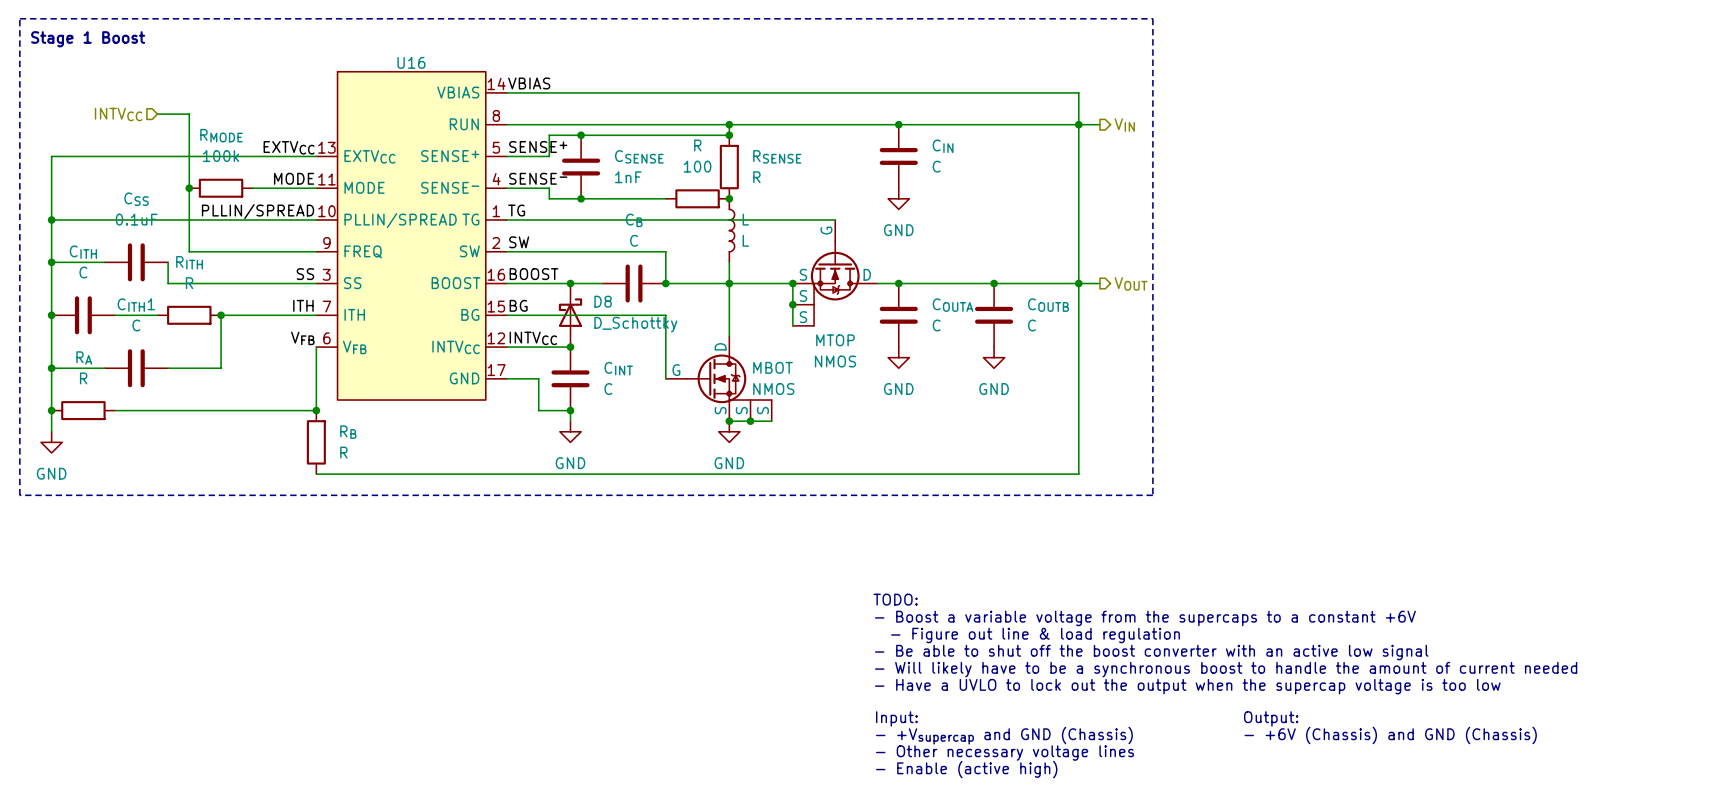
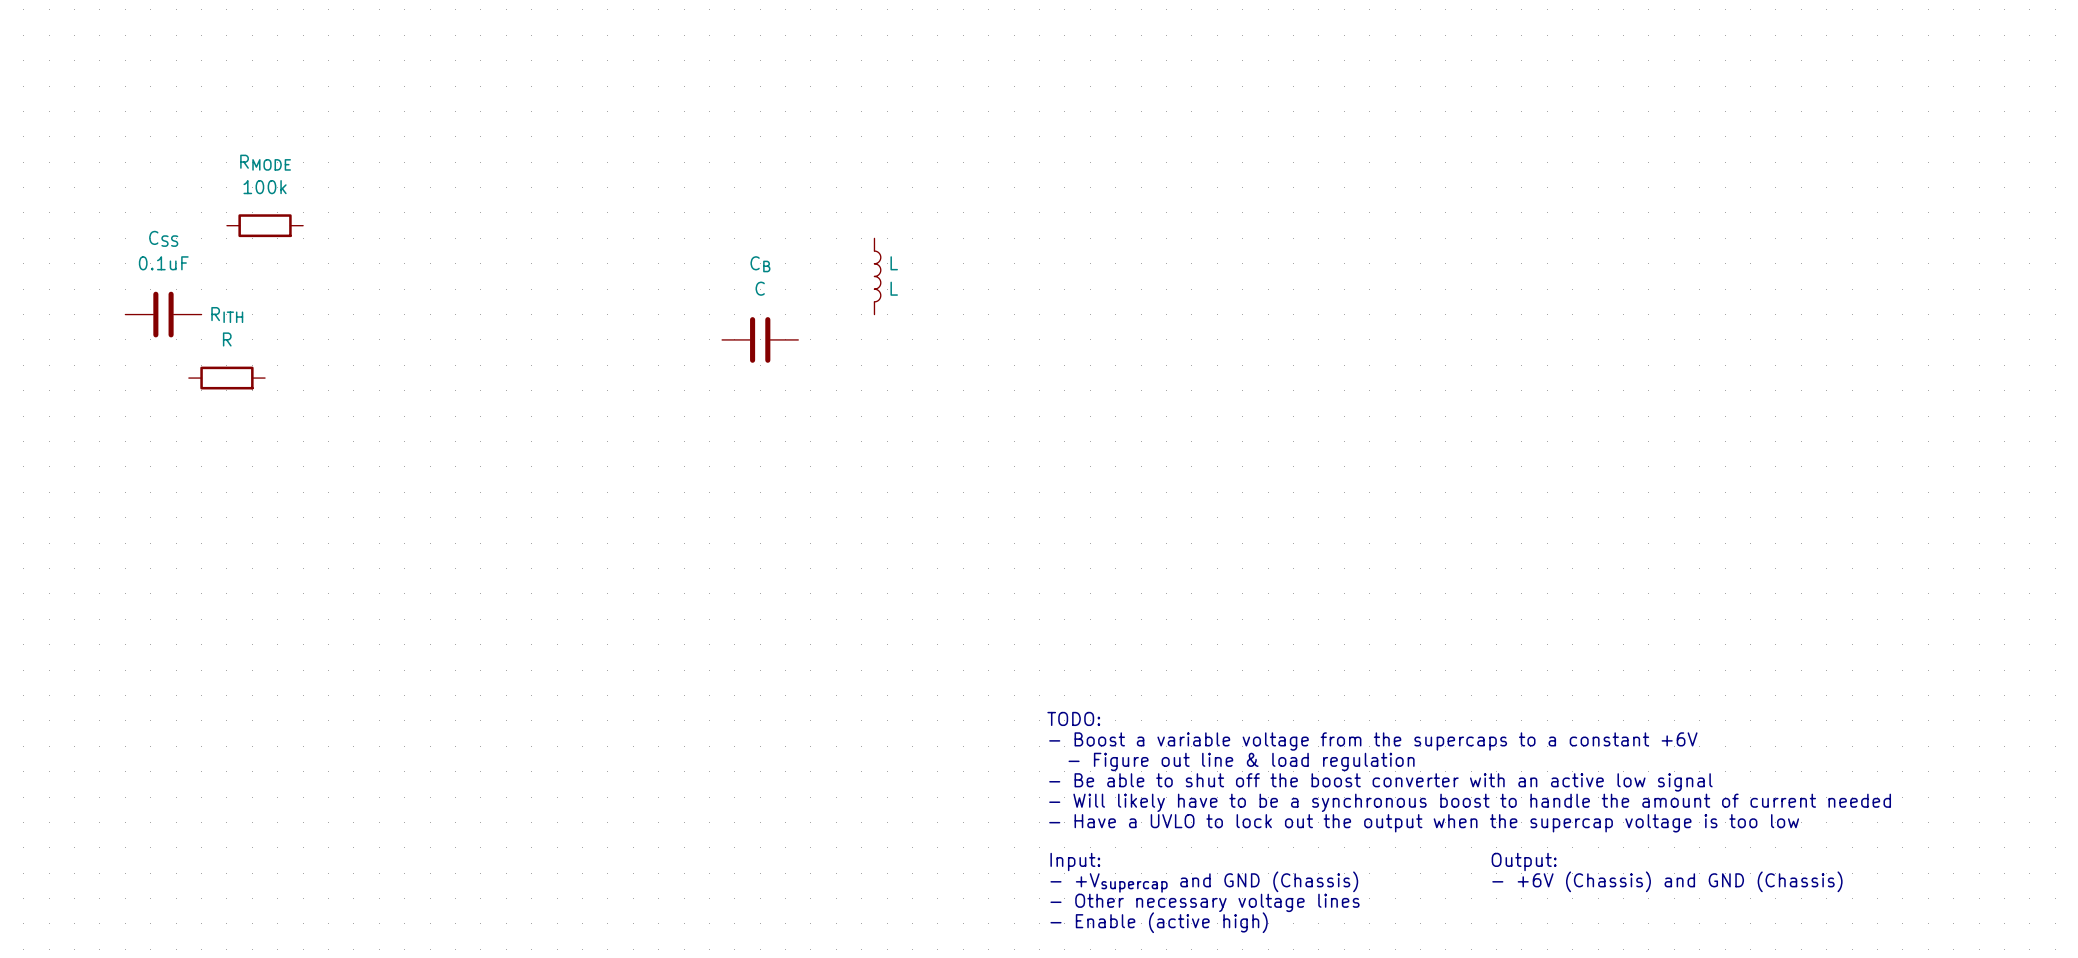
line: (19, 18) (1152, 18) (1152, 495) (19, 495) (19, 18) -> none
text: Stage 1 Boost (88, 39) -> none
label: VBIAS (529, 83) -> none
wire: (506, 92) (1078, 92) (1078, 474) (316, 474) -> none
hierarchical label: INTVCC (118, 114) -> none
wire: (157, 114) (189, 114) (189, 251) (316, 251) -> none
wire: (506, 124) (1099, 124) -> none
wire: (729, 124) (729, 135) (549, 135) (549, 156) (506, 156) -> none
junction: (729, 124) -> none
junction: (898, 124) -> none
junction: (1078, 124) -> none
hierarchical label: VIN (1124, 125) -> none
junction: (581, 135) -> none
junction: (729, 135) -> none
label: EXTVCC (289, 147) -> none
label: SENSE+ (538, 147) -> none
wire: (316, 156) (51, 156) (51, 431) -> none
CIN: C (898, 156) -> none
CSENSE: 1nF (581, 167) -> none
RSENSE: R (729, 167) -> none
label: MODE (294, 178) -> none
label: SENSE- (538, 178) -> none
junction: (189, 188) -> none
wire: (252, 188) (316, 188) -> none
wire: (506, 188) (549, 188) (549, 198) (665, 198) -> none
junction: (581, 198) -> none
R: 100 (697, 198) -> none
junction: (729, 198) -> none
power symbol: GND (898, 198) -> none
label: TG (516, 210) -> none
label: PLLIN/SPREAD (258, 211) -> none
wire: (51, 219) (316, 219) -> none
junction: (51, 219) -> none
wire: (506, 219) (835, 219) -> none
U16: (411, 235) -> none
label: SW (519, 242) -> none
wire: (506, 251) (665, 251) (665, 283) (792, 283) (792, 325) -> none
wire: (51, 262) (104, 262) -> none
junction: (51, 262) -> none
wire: (168, 262) (168, 283) (316, 283) -> none
wire: (729, 262) (729, 336) -> none
MTOP: NMOS (835, 272) -> none
label: SS (305, 274) -> none
label: BOOST (534, 274) -> none
wire: (506, 283) (602, 283) -> none
junction: (570, 283) -> none
junction: (665, 283) -> none
junction: (729, 283) -> none
junction: (792, 283) -> none
wire: (877, 283) (1099, 283) -> none
junction: (898, 283) -> none
junction: (994, 283) -> none
junction: (1078, 283) -> none
hierarchical label: VOUT (1130, 283) -> none
junction: (792, 304) -> none
label: ITH (303, 305) -> none
label: BG (518, 305) -> none
junction: (51, 315) -> none
CITH: C (83, 315) -> none
wire: (115, 315) (157, 315) -> none
junction: (221, 315) -> none
wire: (316, 315) (221, 315) (221, 368) (168, 368) -> none
wire: (506, 315) (665, 315) (665, 378) -> none
D8: D_Schottky (570, 315) -> none
COUTA: C (898, 315) -> none
COUTB: C (994, 315) -> none
label: VFB (302, 338) -> none
label: INTVCC (533, 338) -> none
wire: (316, 347) (316, 410) (115, 410) -> none
wire: (506, 347) (570, 347) -> none
junction: (570, 347) -> none
power symbol: GND (898, 357) -> none
power symbol: GND (994, 357) -> none
wire: (51, 368) (104, 368) -> none
junction: (51, 368) -> none
CITH1: C (136, 368) -> none
wire: (506, 378) (538, 378) (538, 410) (570, 410) (570, 421) -> none
CINT: C (570, 378) -> none
MBOT: NMOS (718, 378) -> none
junction: (51, 410) -> none
RA: R (83, 410) -> none
junction: (316, 410) -> none
junction: (570, 410) -> none
wire: (729, 421) (771, 421) -> none
junction: (729, 421) -> none
junction: (750, 421) -> none
power symbol: GND (570, 431) -> none
power symbol: GND (729, 431) -> none
power symbol: GND (51, 442) -> none
RB: R (316, 442) -> none

